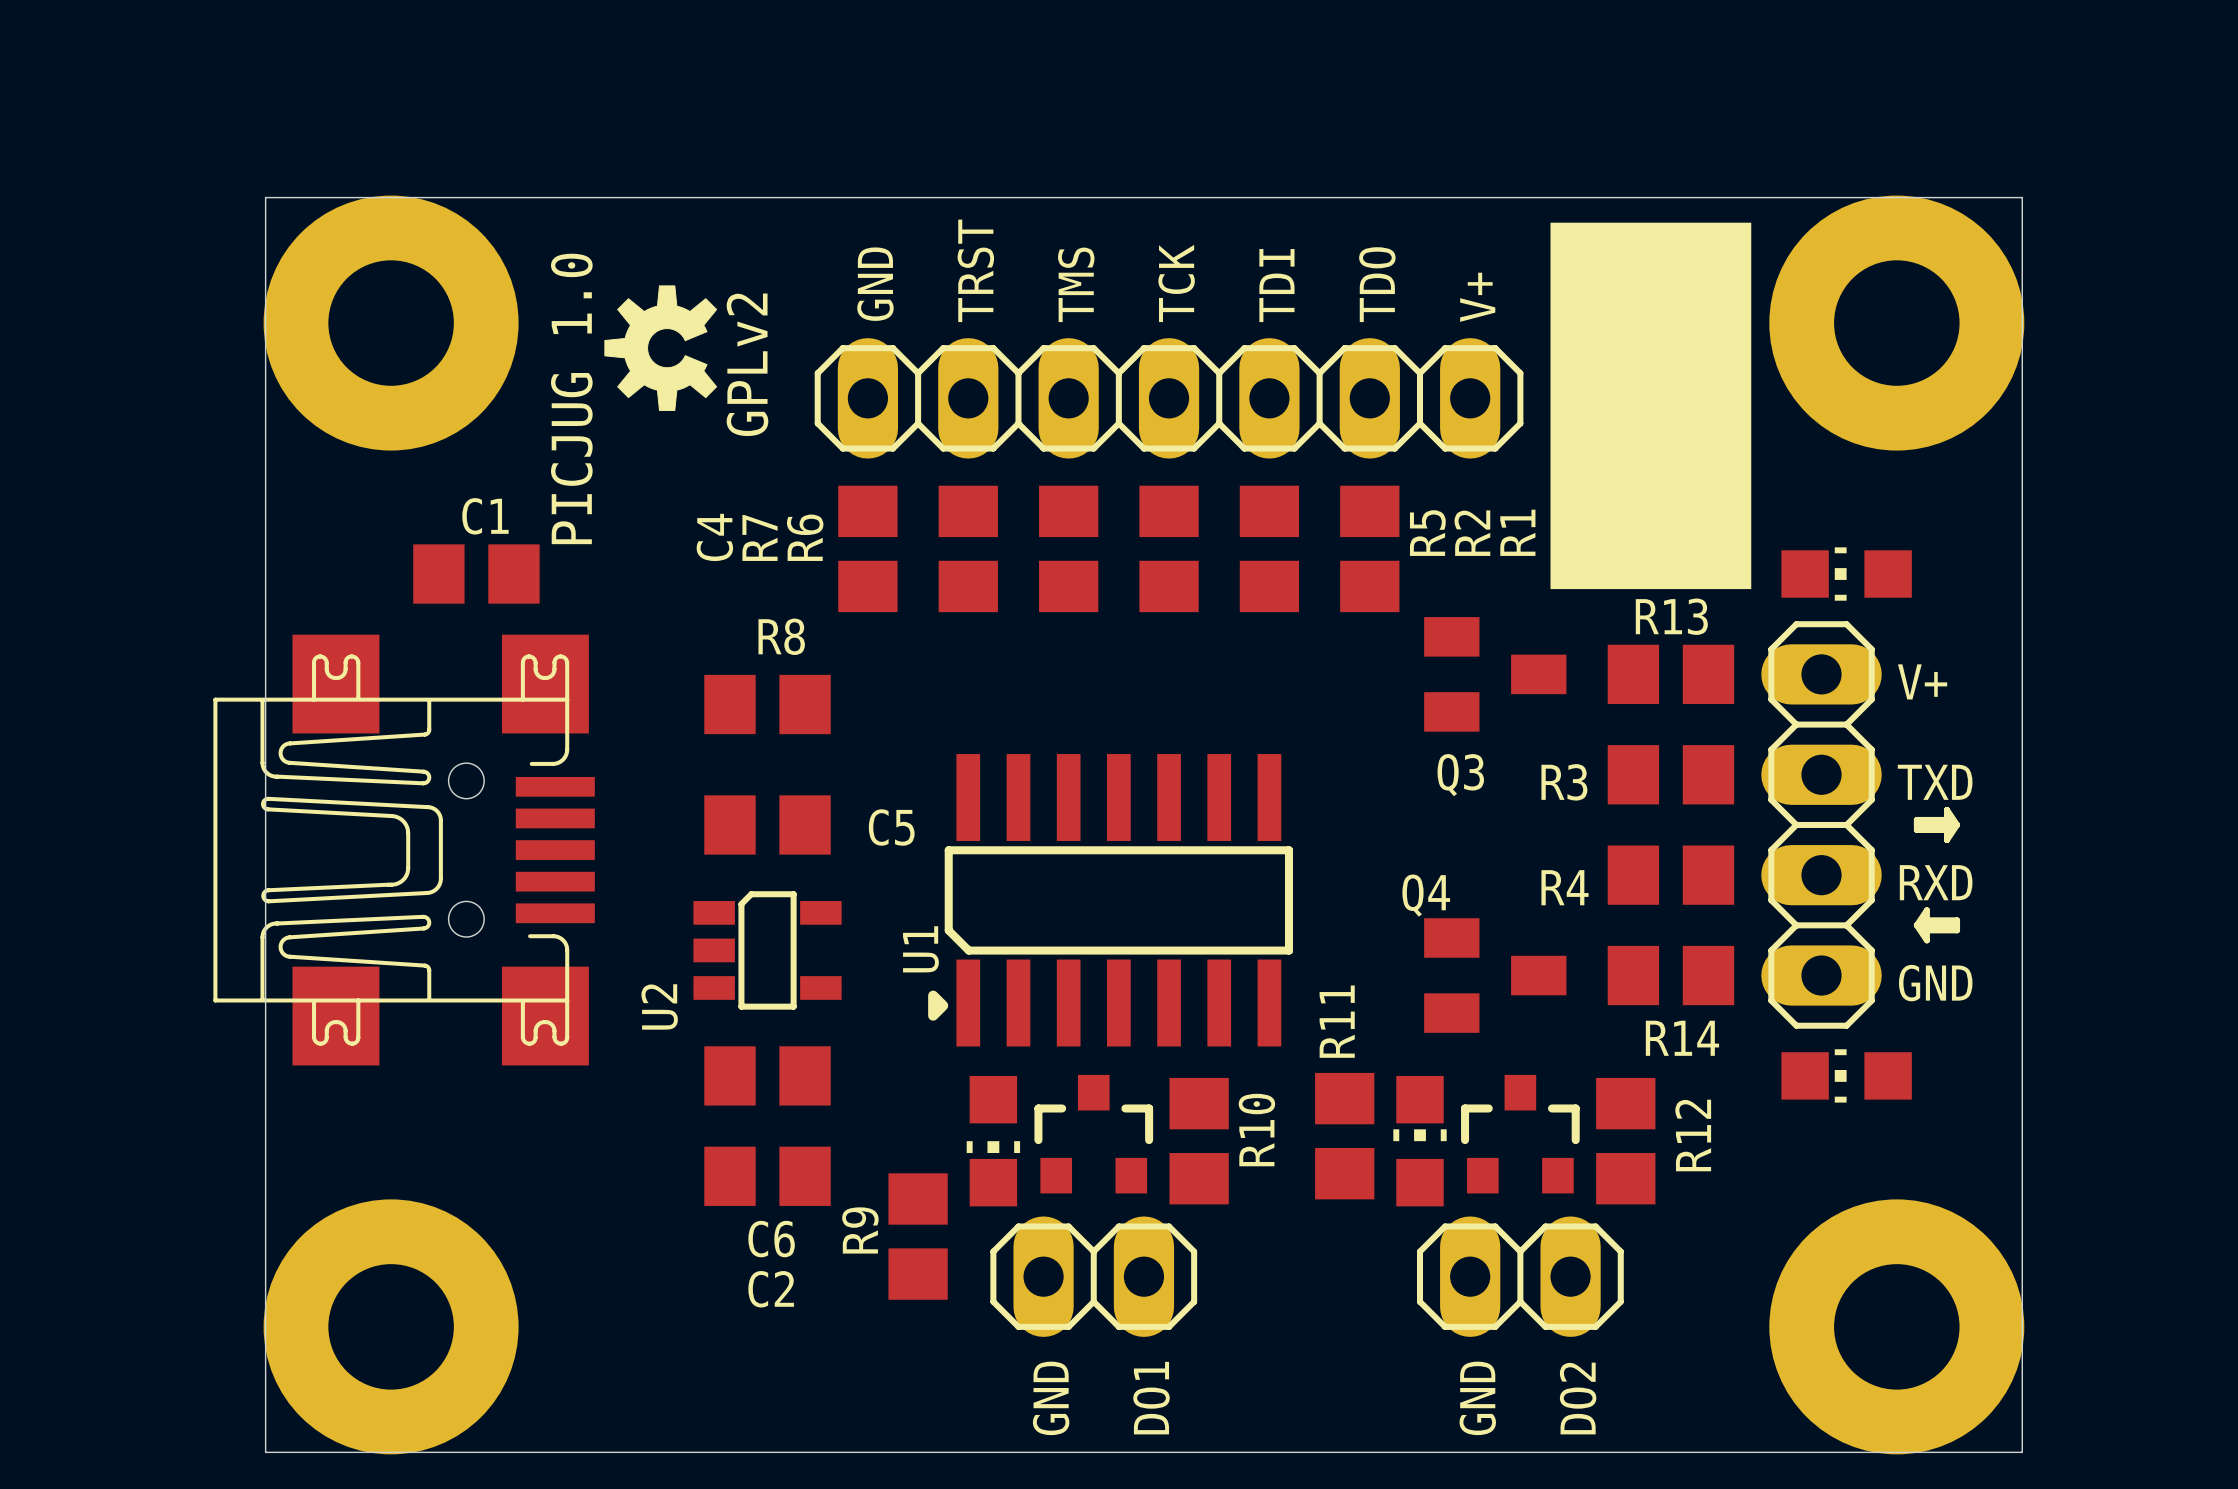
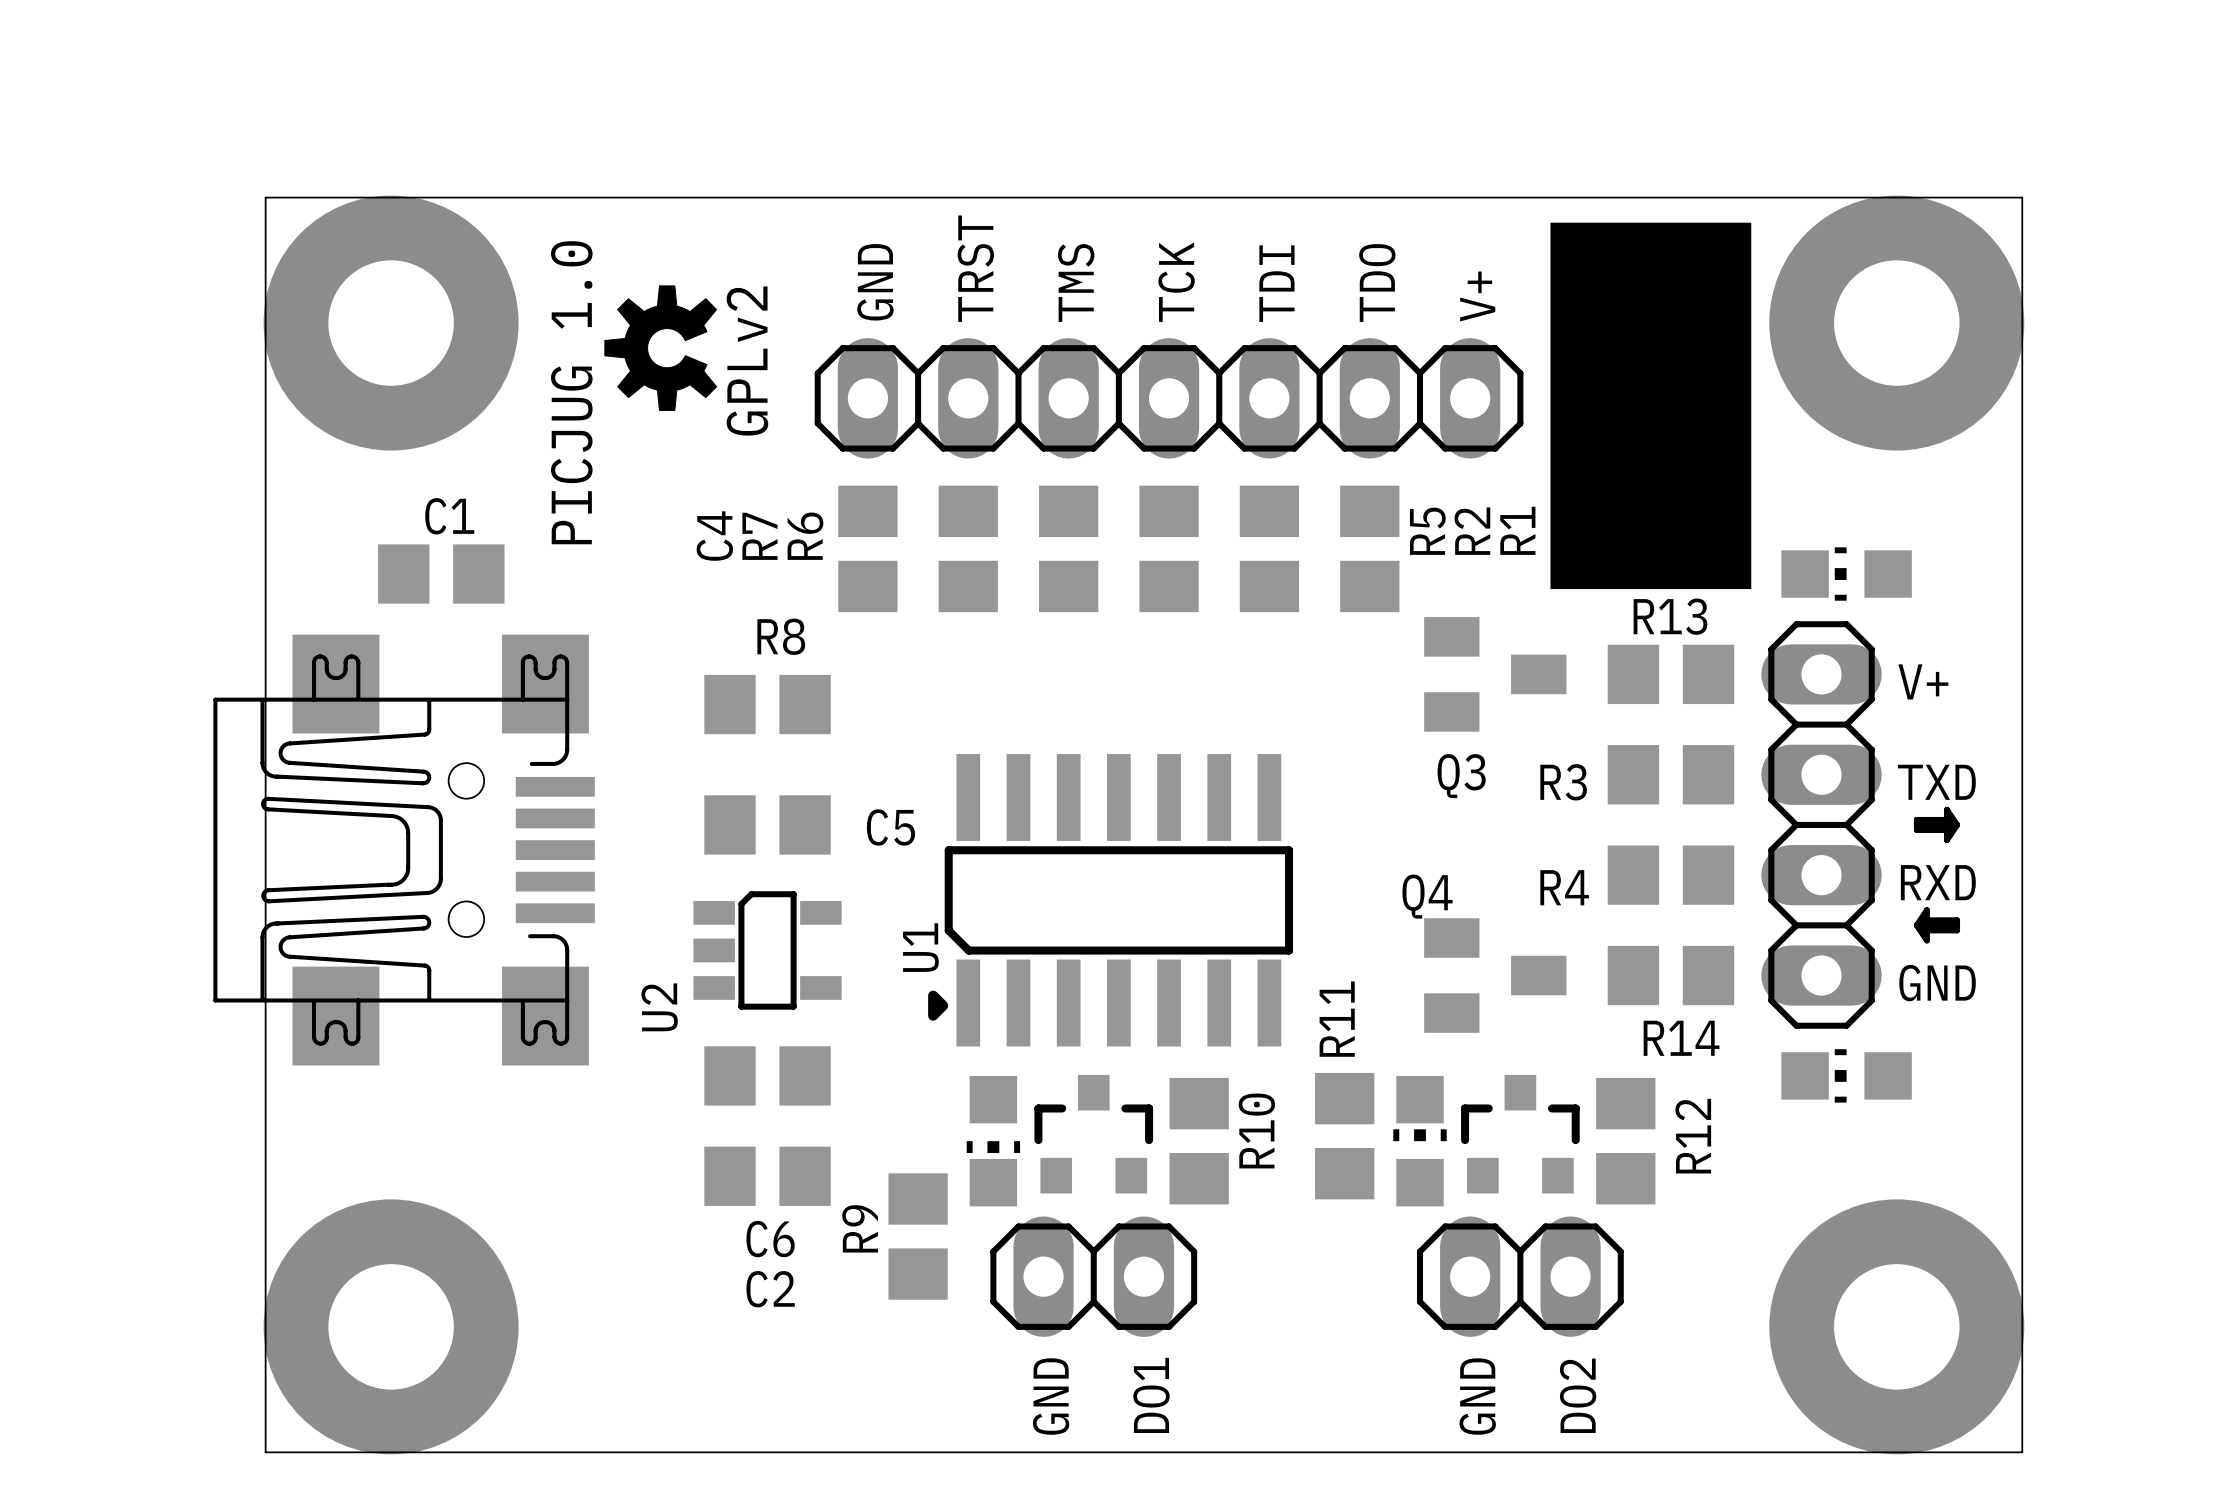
C1 position: (476, 574) -> (441, 574)

